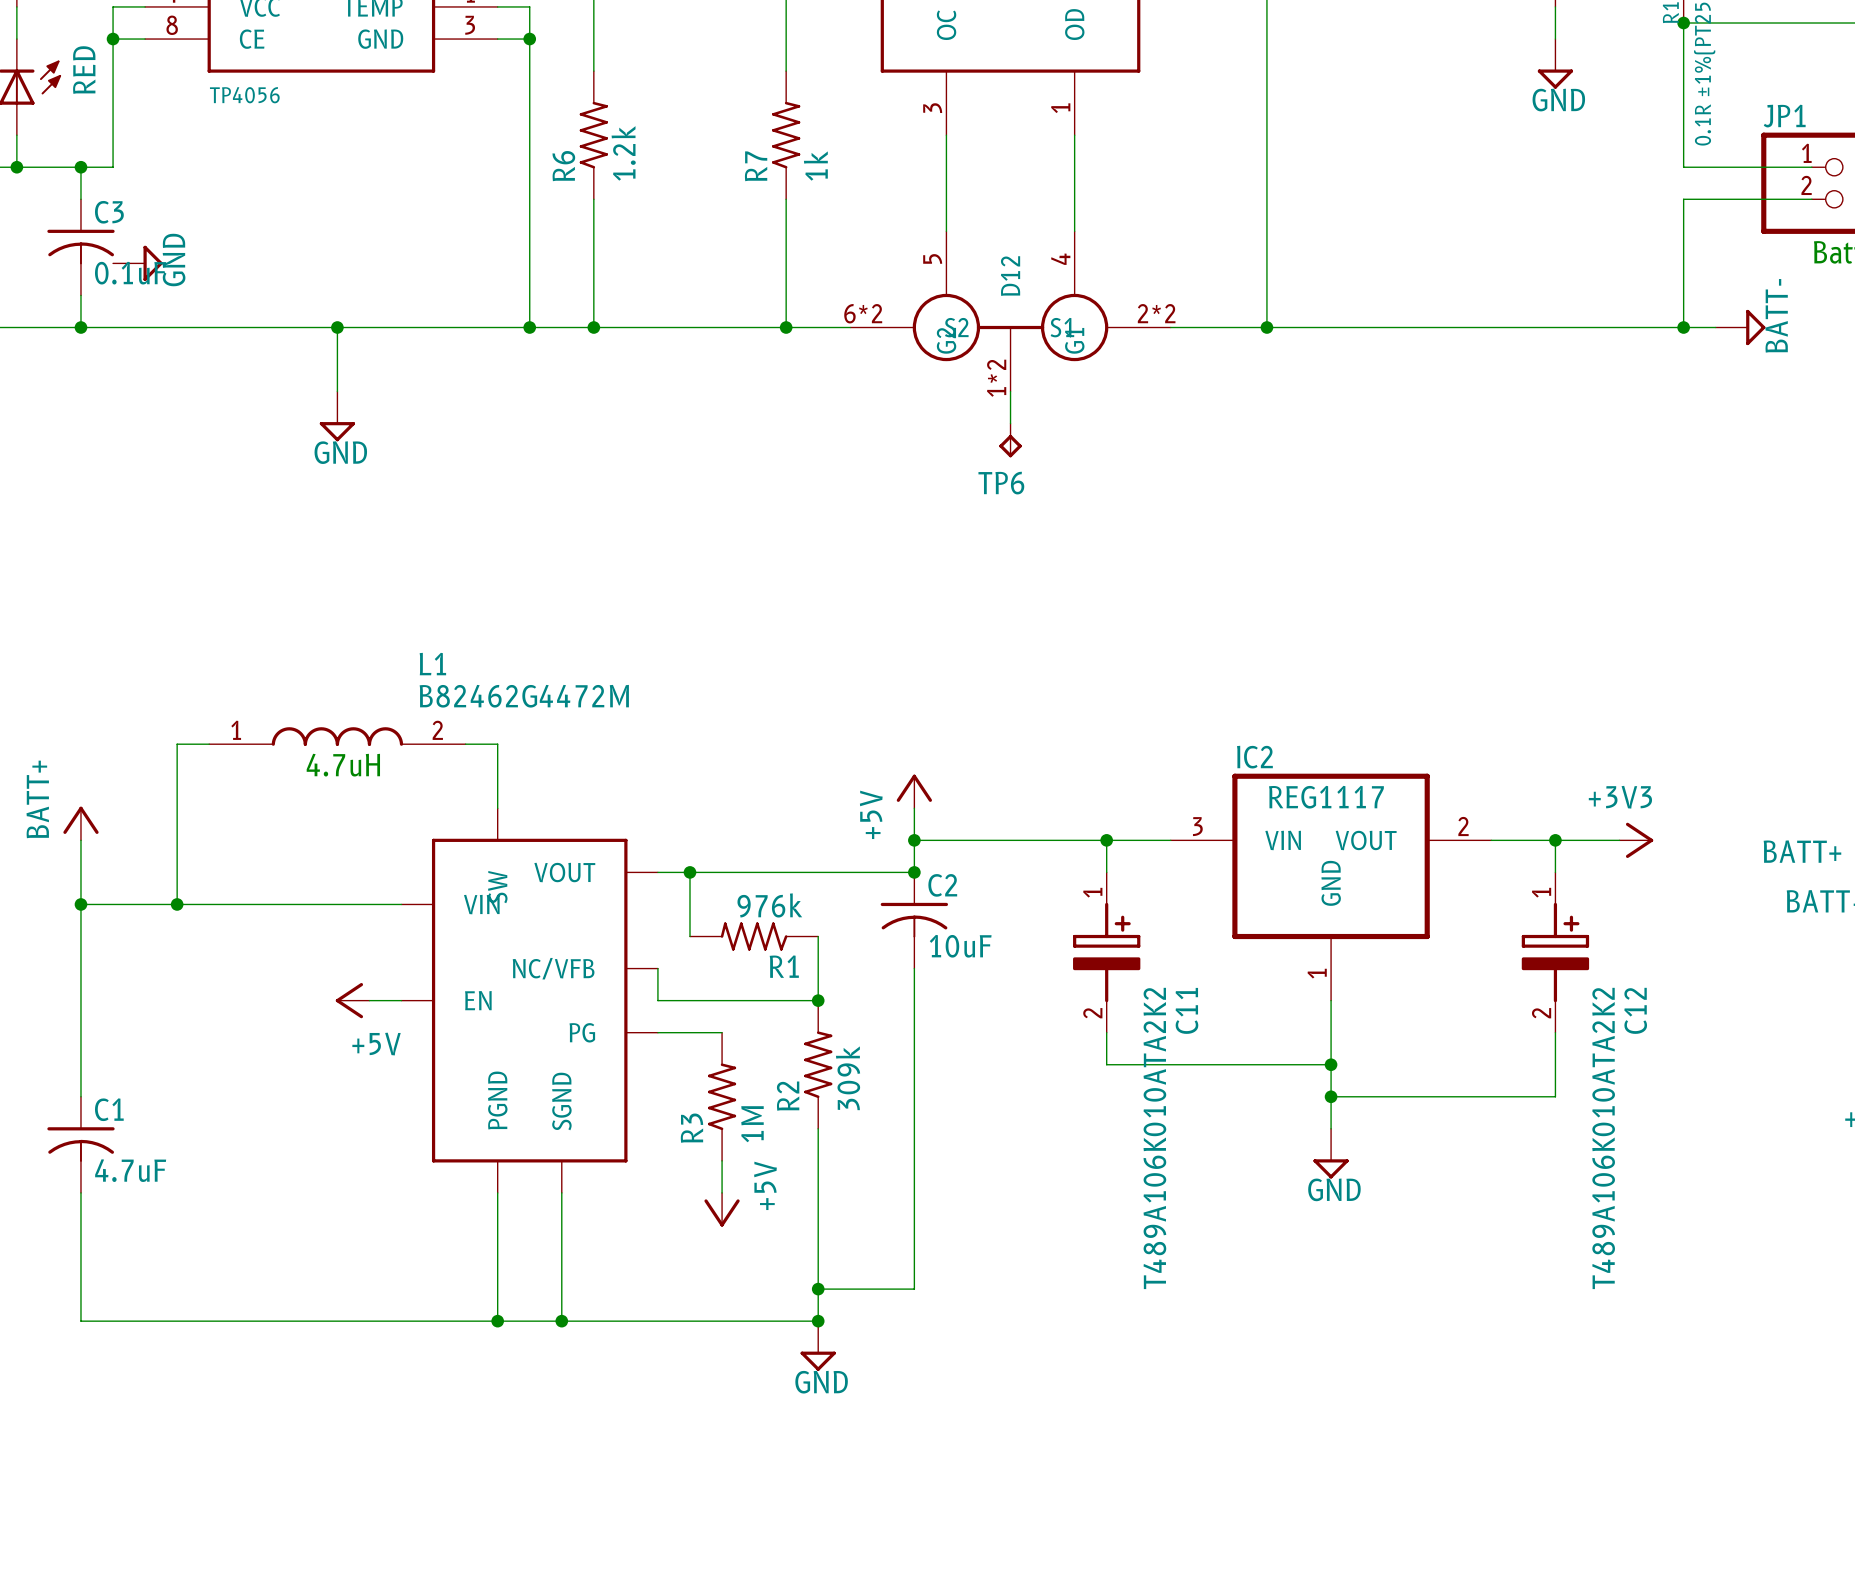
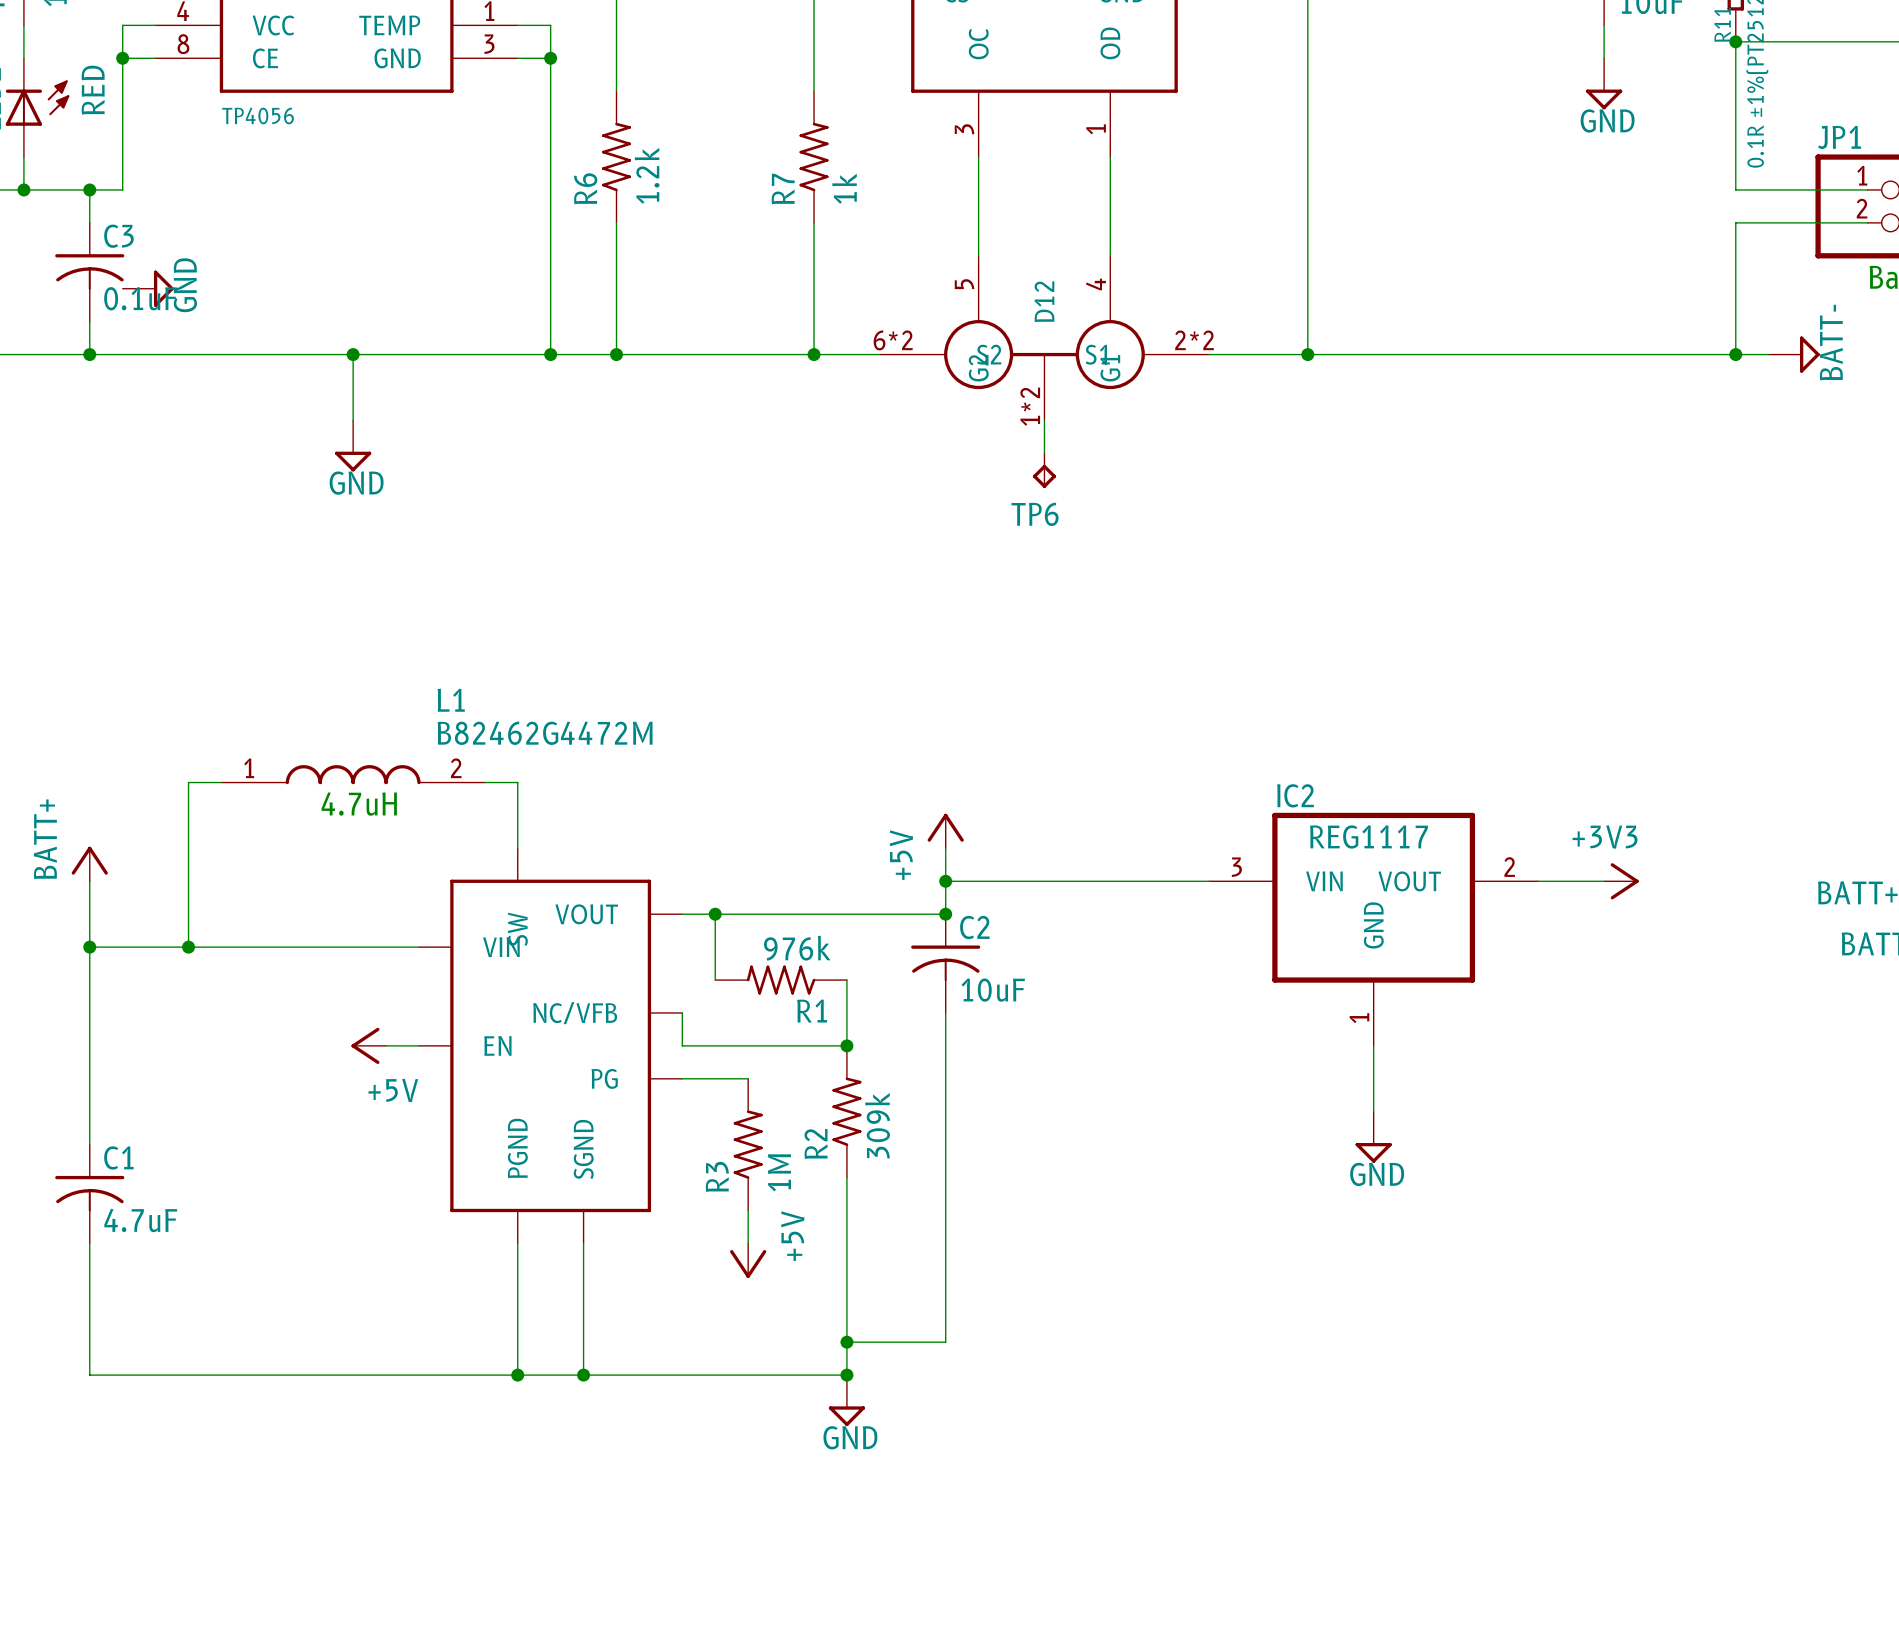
wire: (1106, 840) (1106, 872) -> none
junction: (1106, 840) -> none
junction: (1555, 840) -> none
wire: (1619, 840) (1555, 840) (1555, 872) -> none
power symbol position: +3V3 (1636, 840) -> +3V3 (1621, 881)
C11: T489A106K010ATA2K2 (1106, 952) -> none
C12: T489A106K010ATA2K2 (1555, 952) -> none
wire: (1106, 1032) (1106, 1064) (1331, 1064) (1331, 1128) -> none
wire: (1555, 1032) (1555, 1096) (1331, 1096) -> none
junction: (1331, 1064) -> none
junction: (1331, 1096) -> none
power symbol position: GND (1331, 1153) -> GND (1373, 1137)

